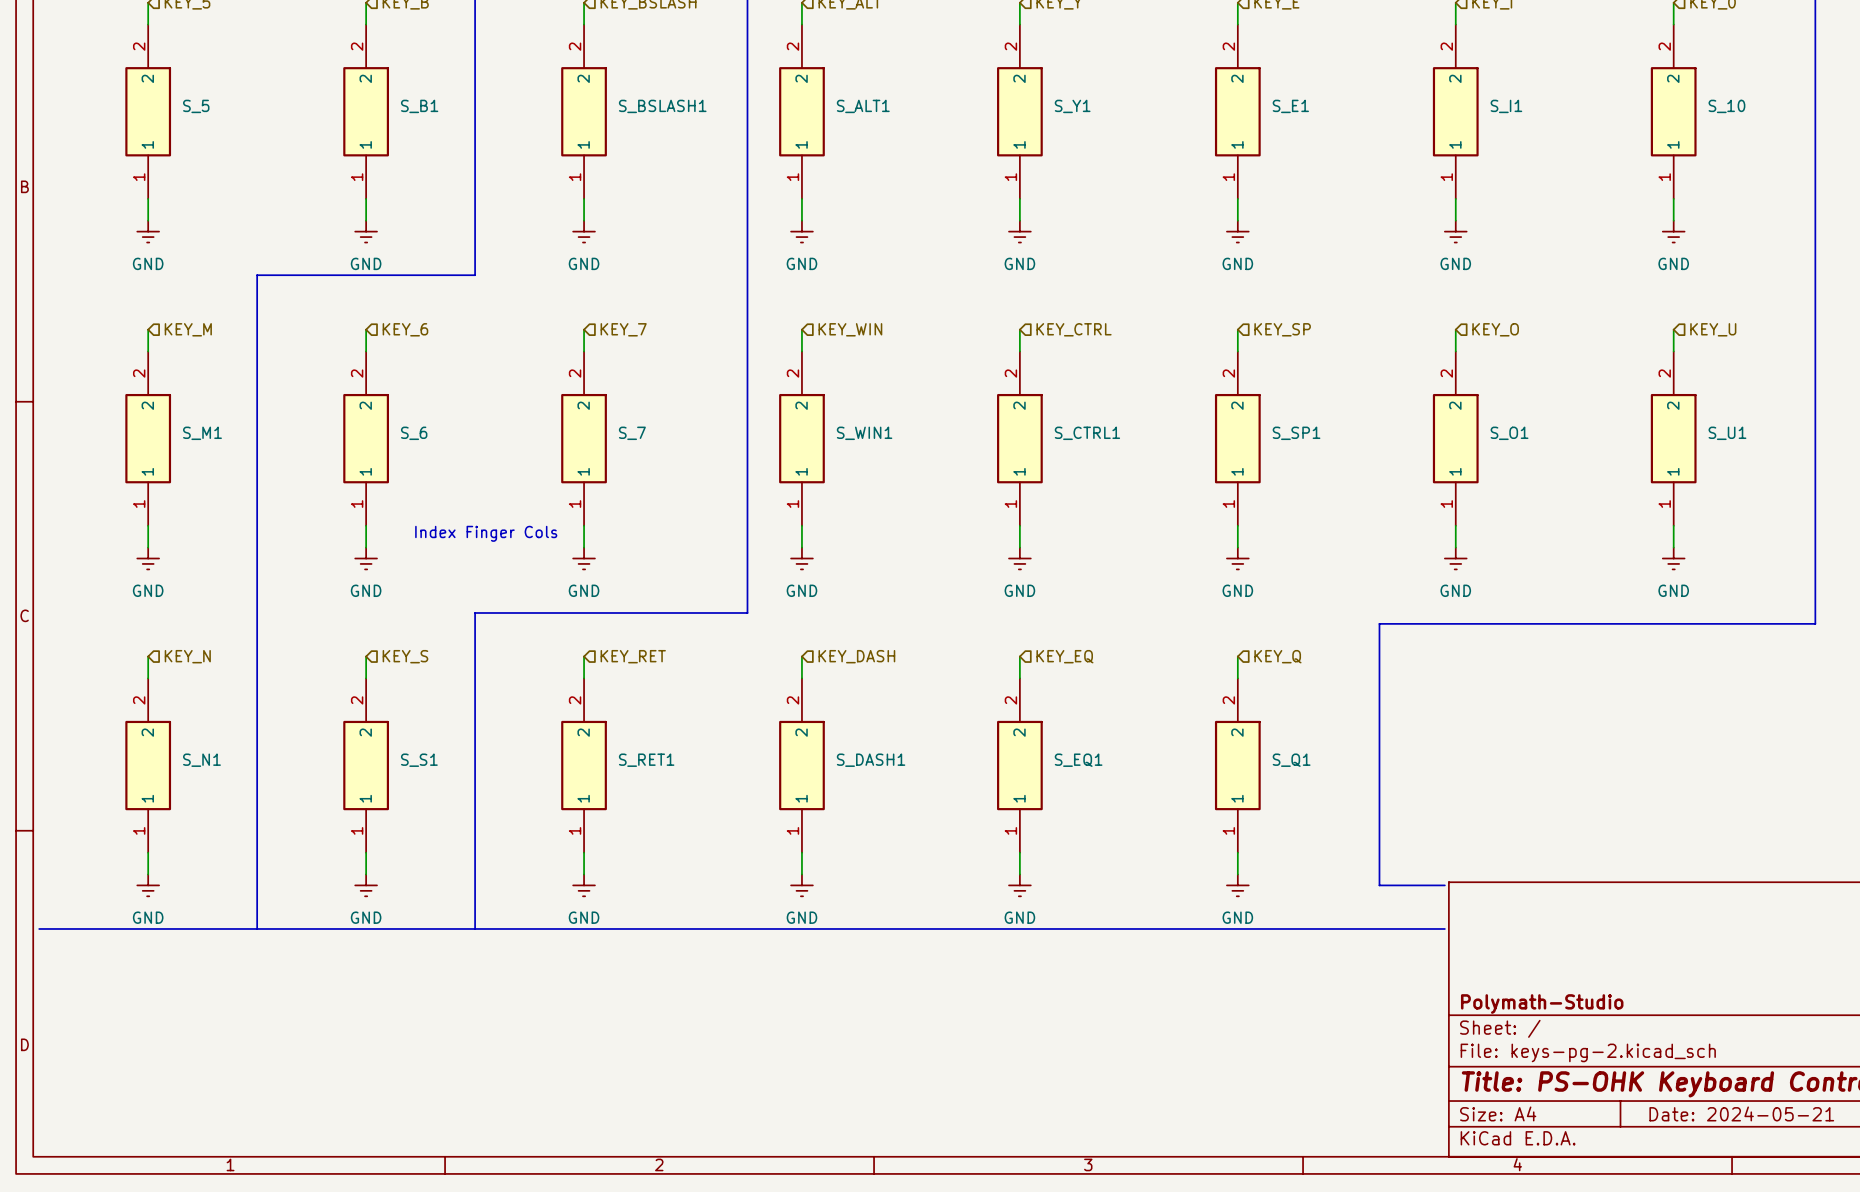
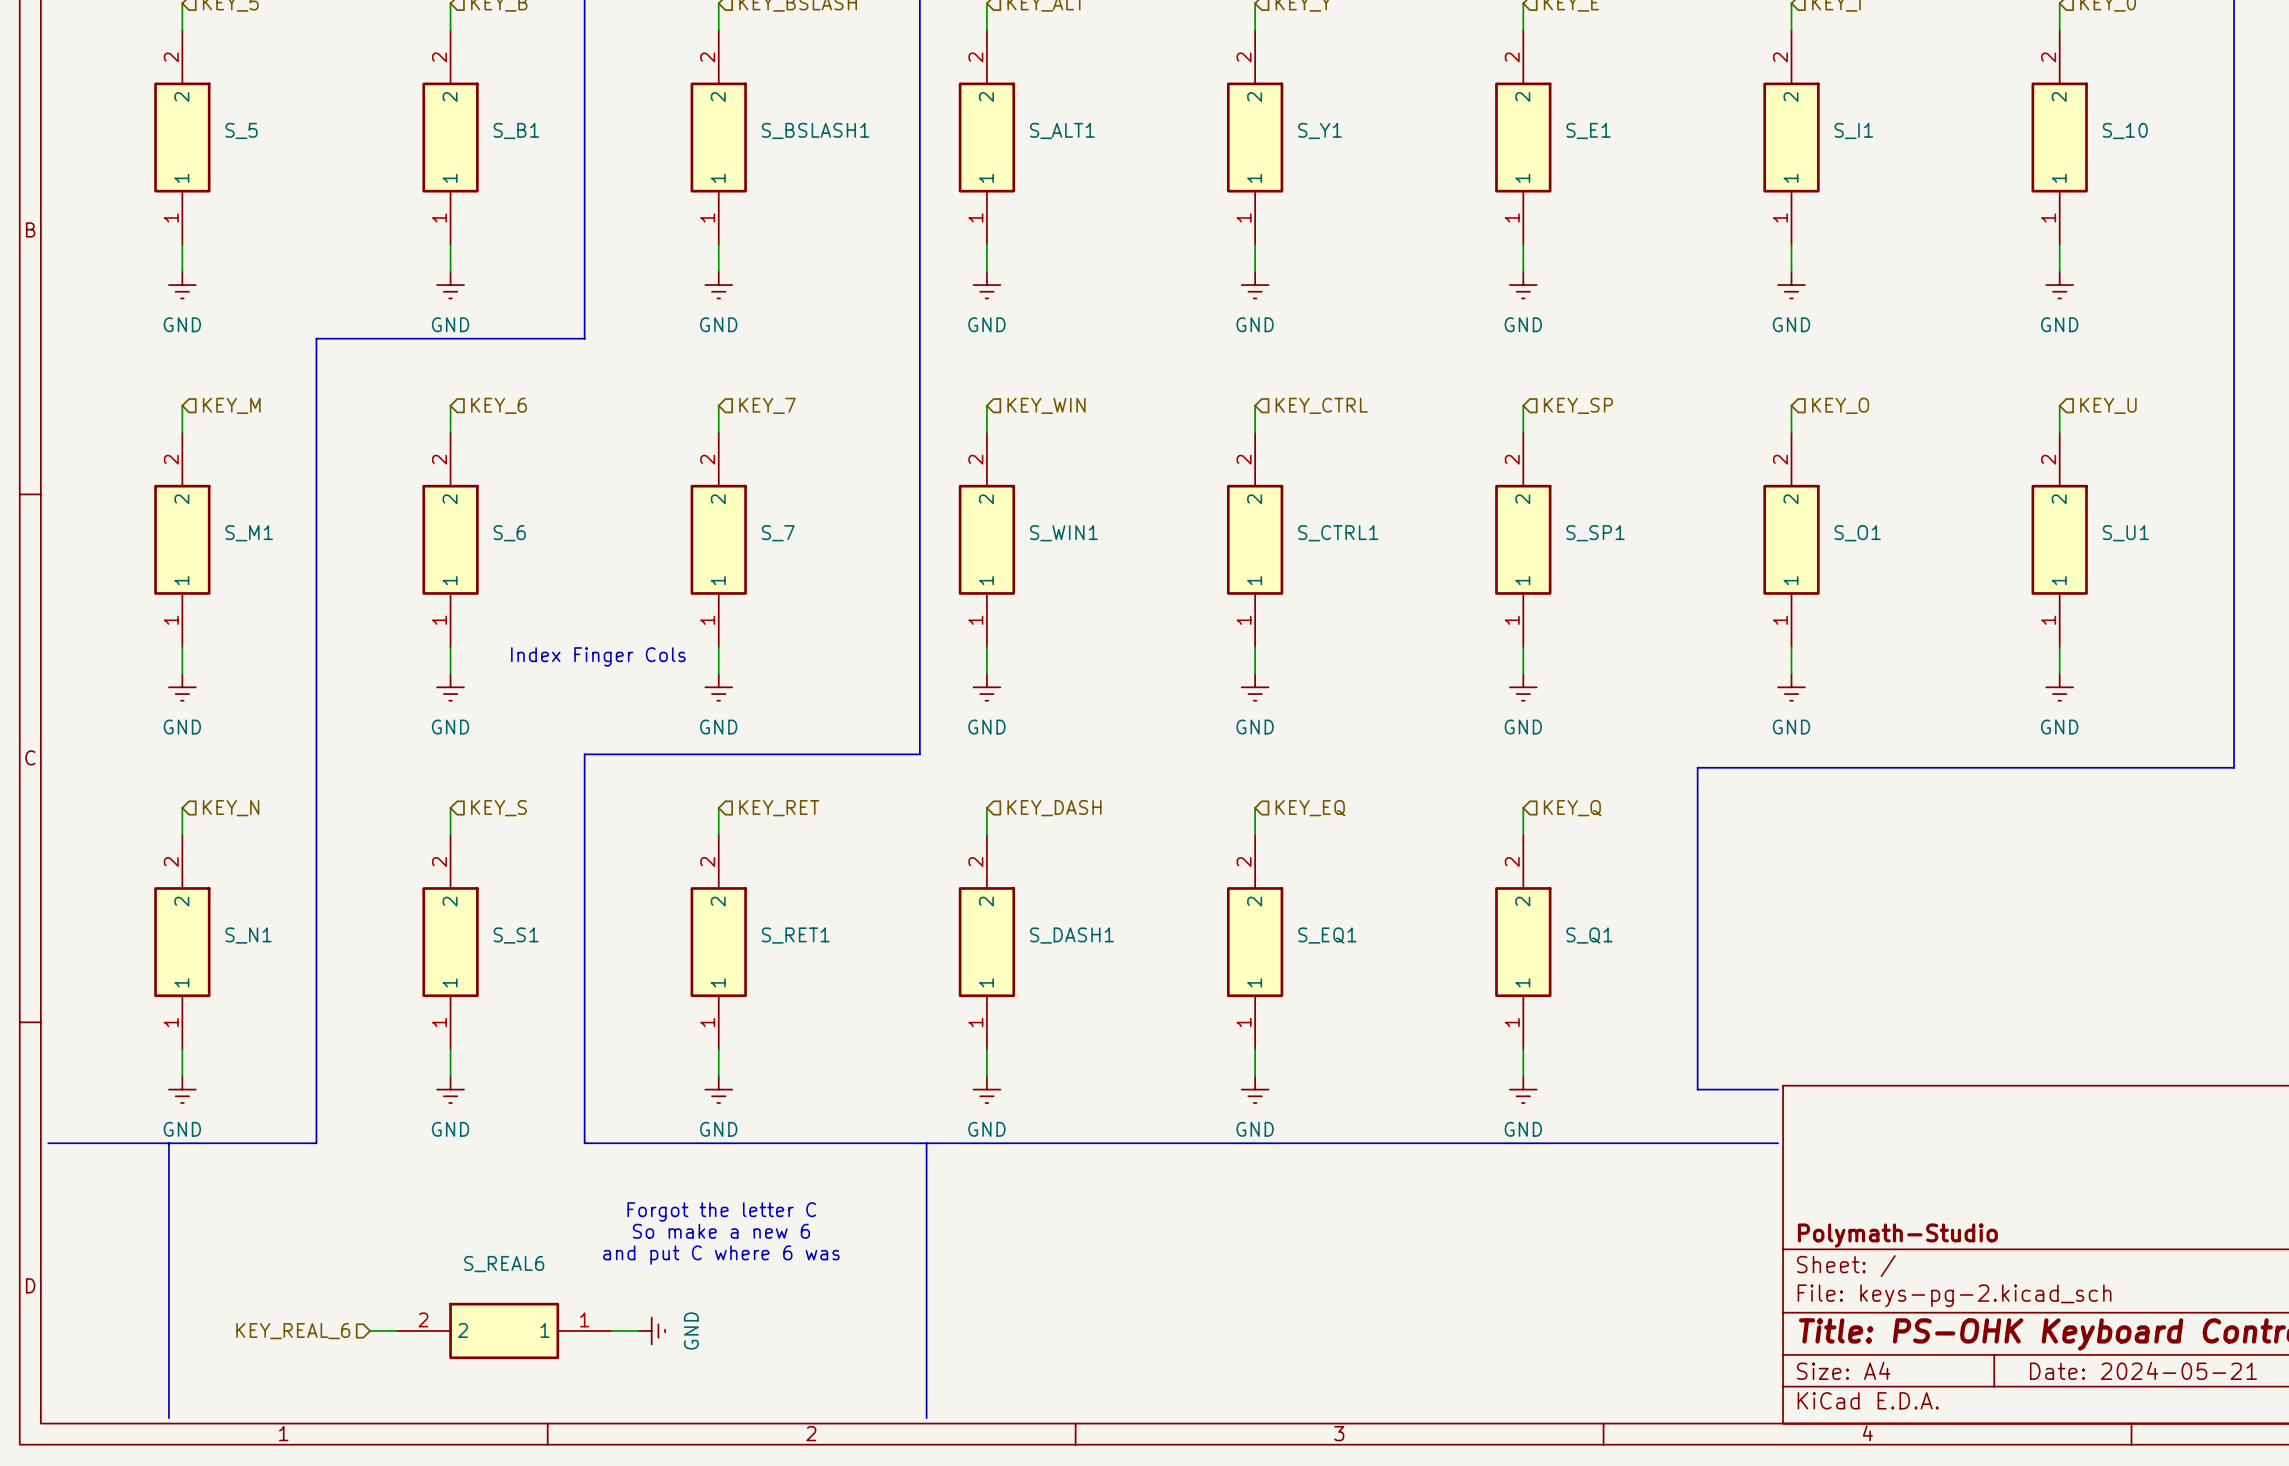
line: none -> (168, 1143) (168, 1418)
line: (257, 928) (475, 928) -> none
line: none -> (926, 1143) (926, 1418)
text: none -> Forgot the letter C (721, 1211)
text: none -> So make a new 6 (721, 1231)
text: none -> and put C where 6 was (721, 1255)
hierarchical label: none -> KEY_REAL_6 (293, 1331)
wire: none -> (370, 1330) (396, 1330)
S_REAL6: none -> (504, 1330)
wire: none -> (611, 1330) (638, 1330)
power symbol: none -> GND (651, 1330)

